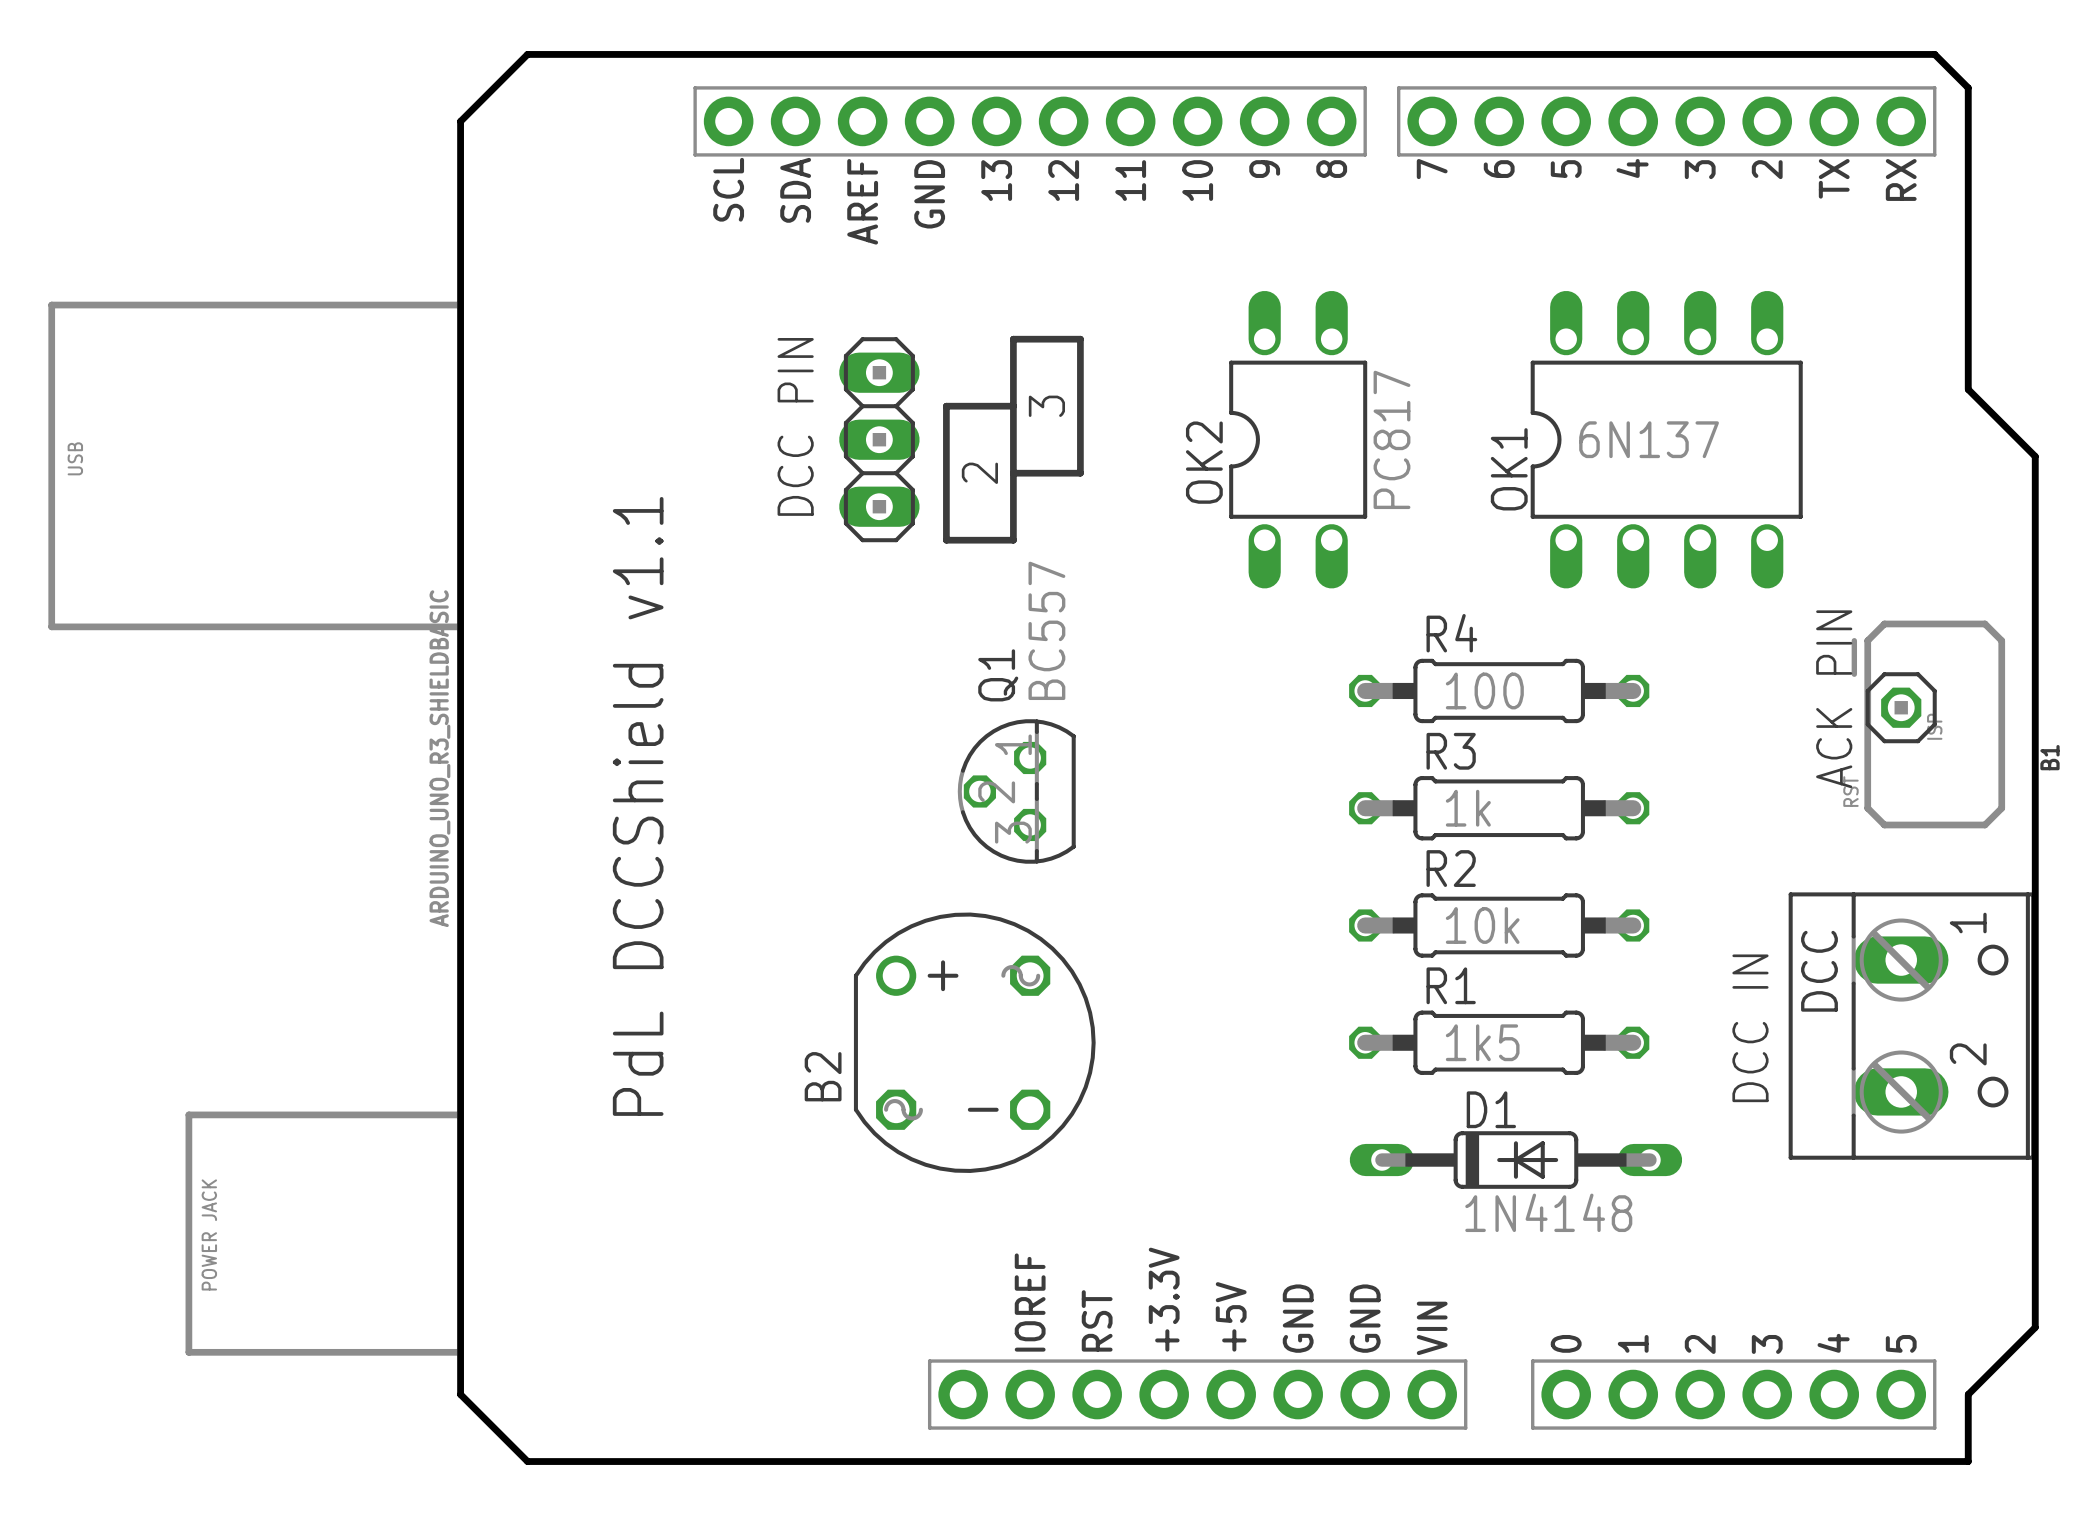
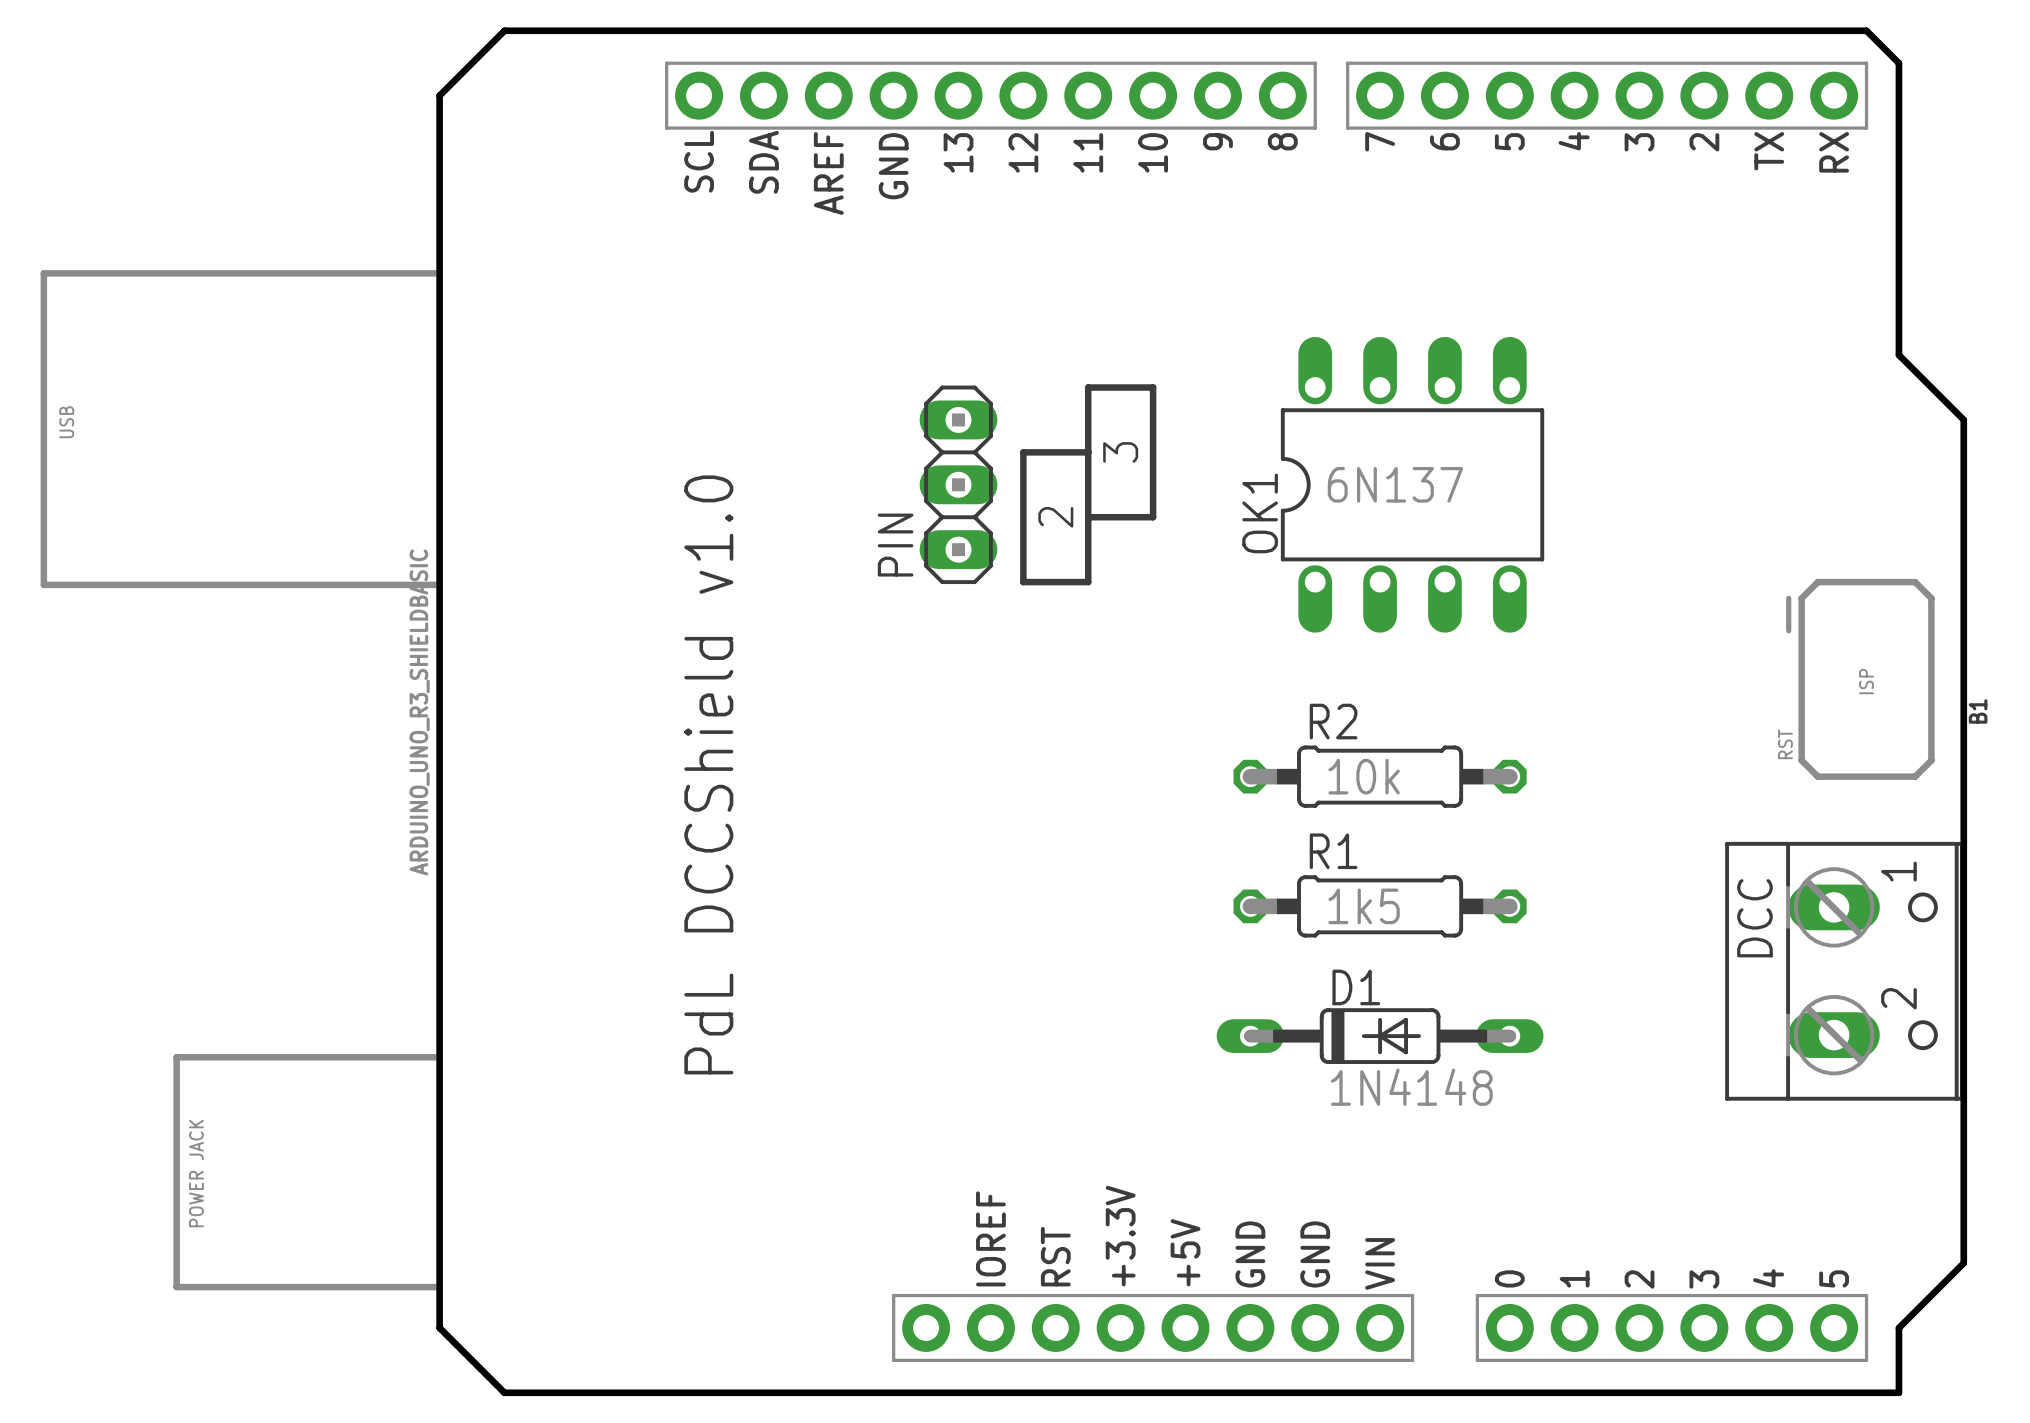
OK1 footprint: [1530, 290, 1803, 589] -> [1280, 336, 1545, 633]
line: (1013, 406) (946, 406) (946, 540) (1013, 540) (1013, 339) (1080, 339) (1080, 473) (1013, 473) -> (1088, 452) (1023, 452) (1023, 582) (1088, 582) (1088, 387) (1153, 387) (1153, 517) (1088, 517)
text position: 3 (1046, 406) -> 3 (1120, 452)
text: DCC PIN (795, 426) -> none
part: (879, 439) -> none
OK2: PC817 (1298, 439) -> none
text position: 2 (979, 473) -> 2 (1055, 517)
PIN: none -> (958, 484)
R4: 100 (1499, 690) -> none
text: ACK PIN (1834, 699) -> none
part: (1901, 707) -> none
Q1: BC557 (1016, 791) -> none
text: PdL DCCShield v1.1 (638, 806) -> none
R3: 1k (1499, 808) -> none
text: none -> PdL DCCShield v1.0 (708, 774)
R2 footprint: [1349, 893, 1650, 958] -> [1233, 745, 1527, 808]
R1 footprint: [1349, 1010, 1650, 1075] -> [1233, 875, 1527, 938]
text: DCC IN (1750, 1028) -> none
B2: (974, 1042) -> none
D1 footprint: [1349, 1131, 1683, 1189] -> [1216, 1008, 1544, 1064]

